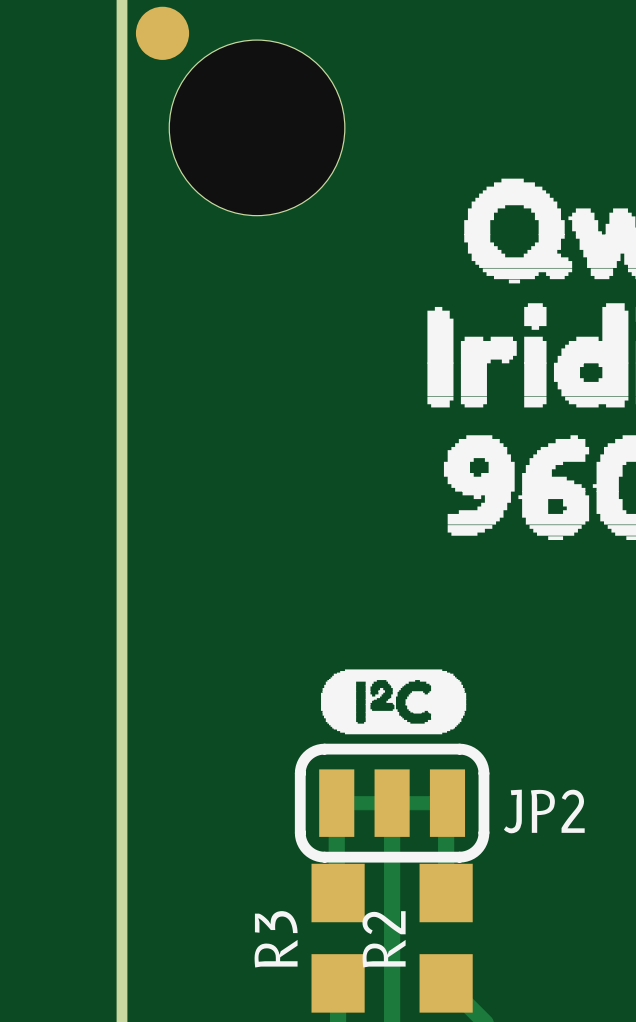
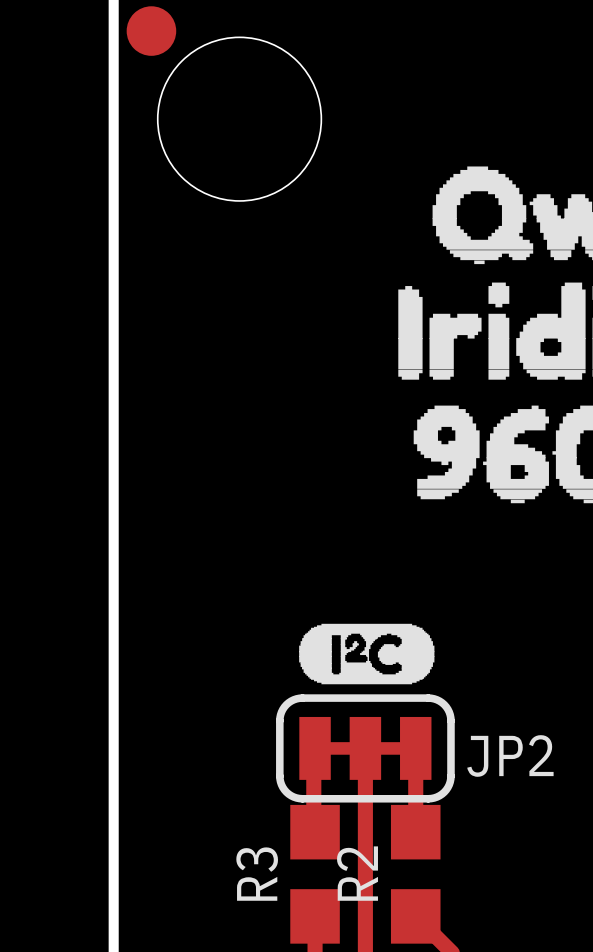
JP2 footprint: [294, 743, 490, 863] -> [276, 694, 455, 803]

